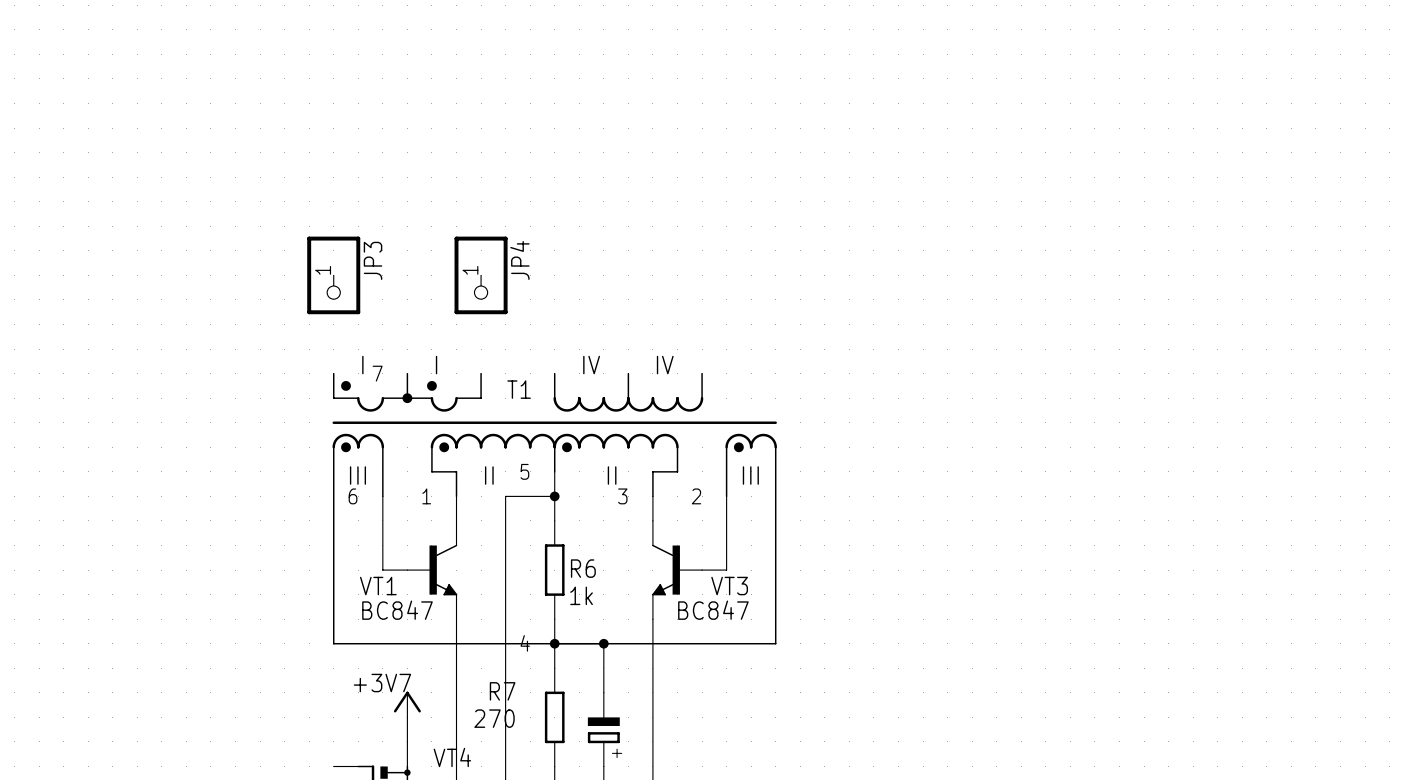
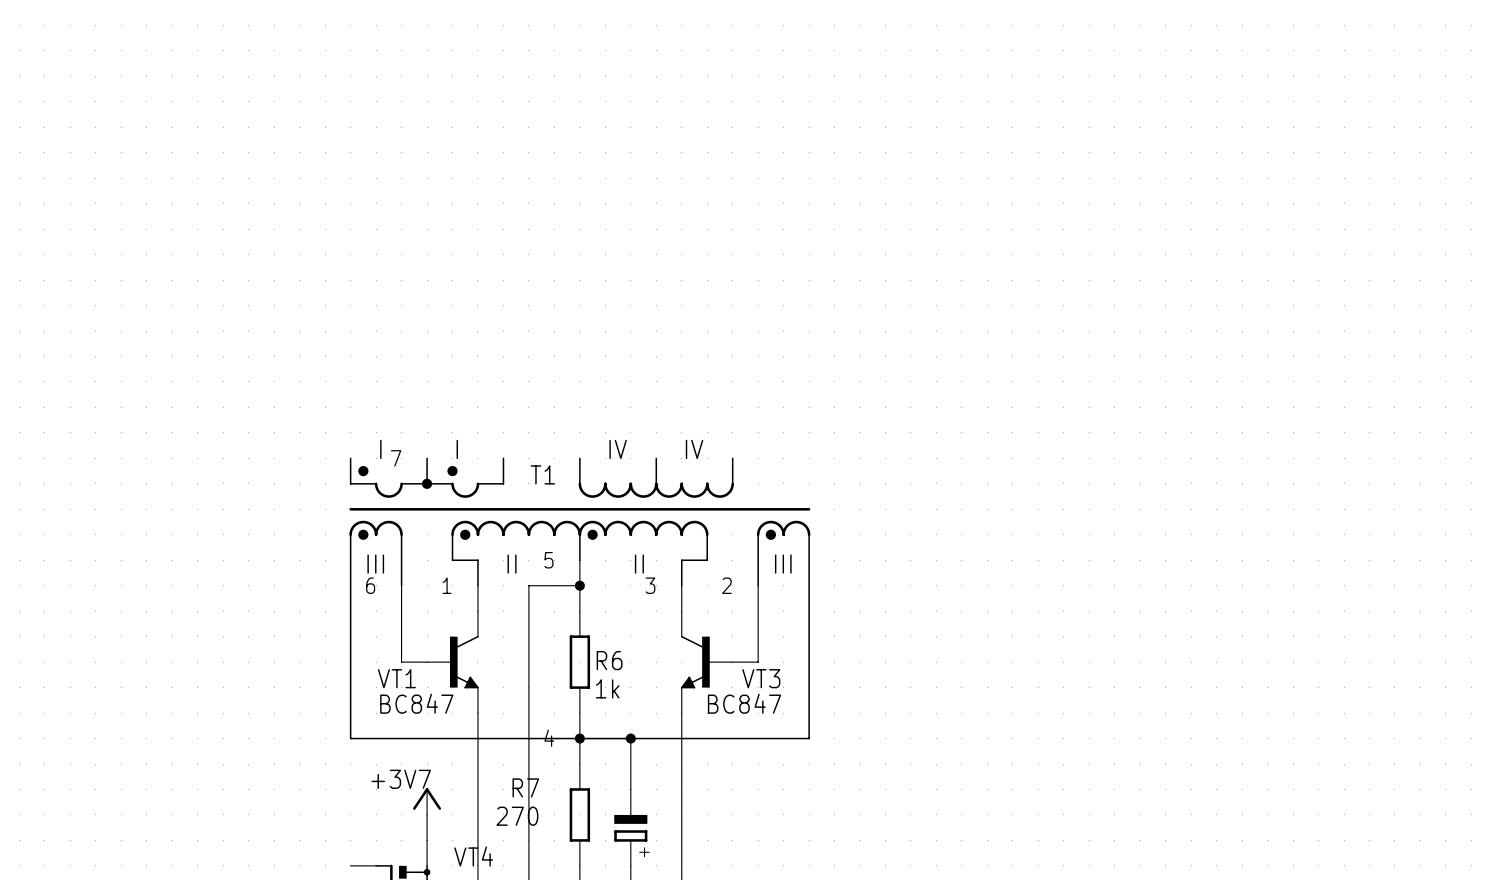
JP3: (333, 275) -> none
JP4: (481, 275) -> none

